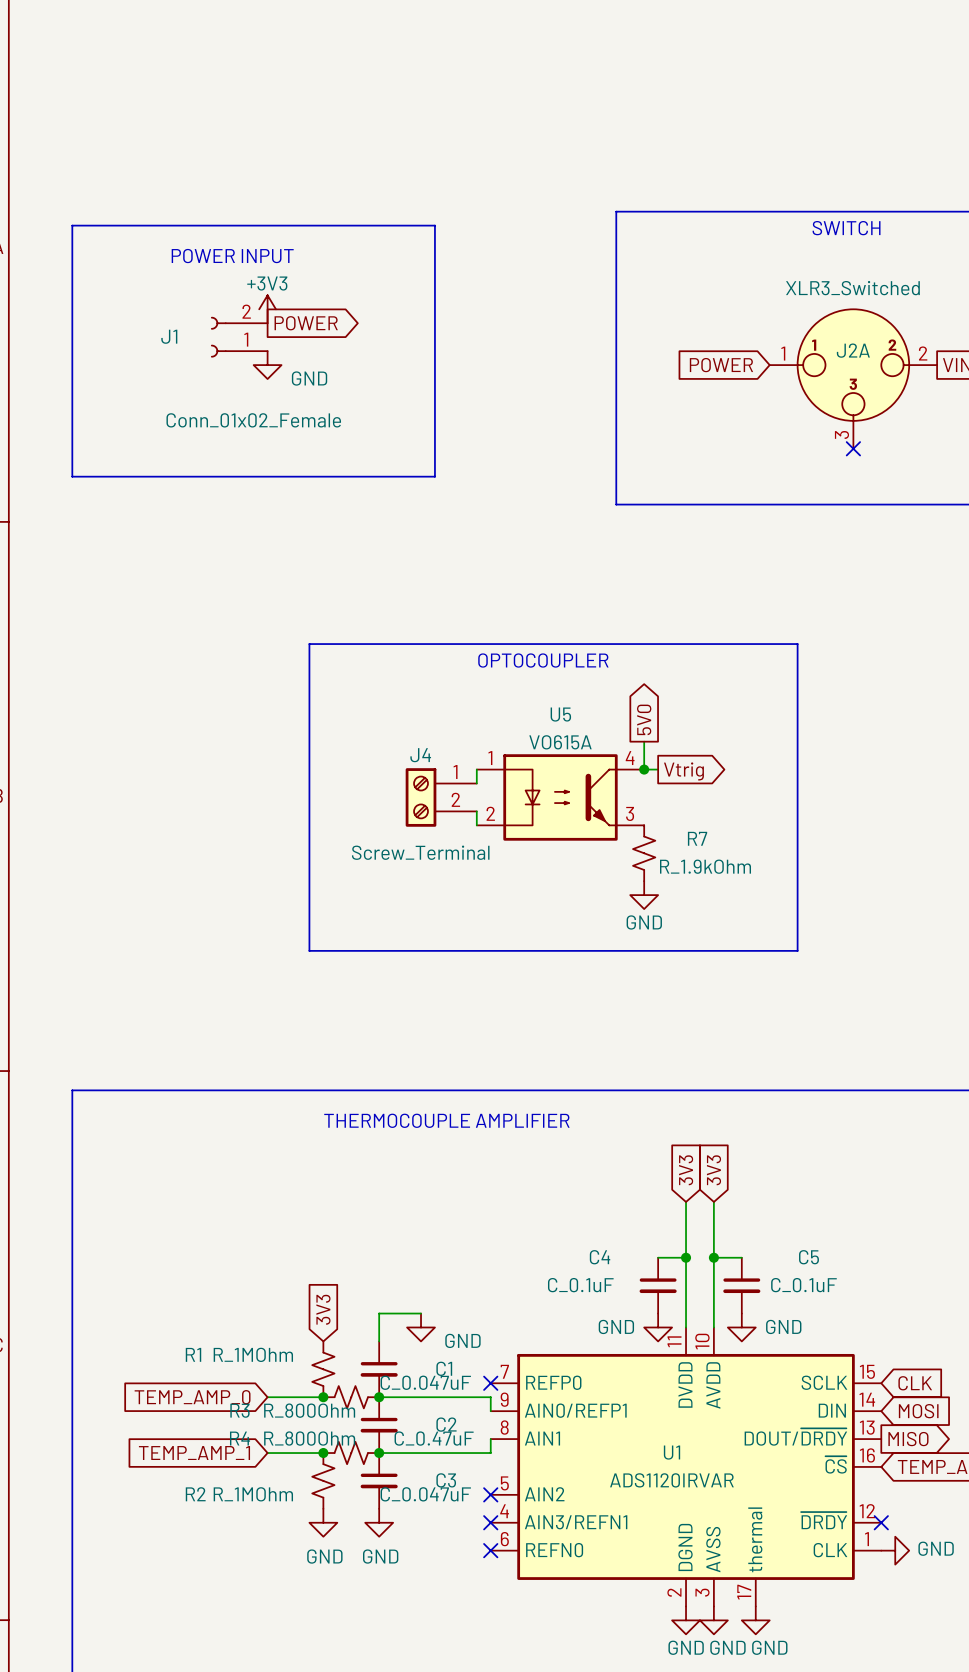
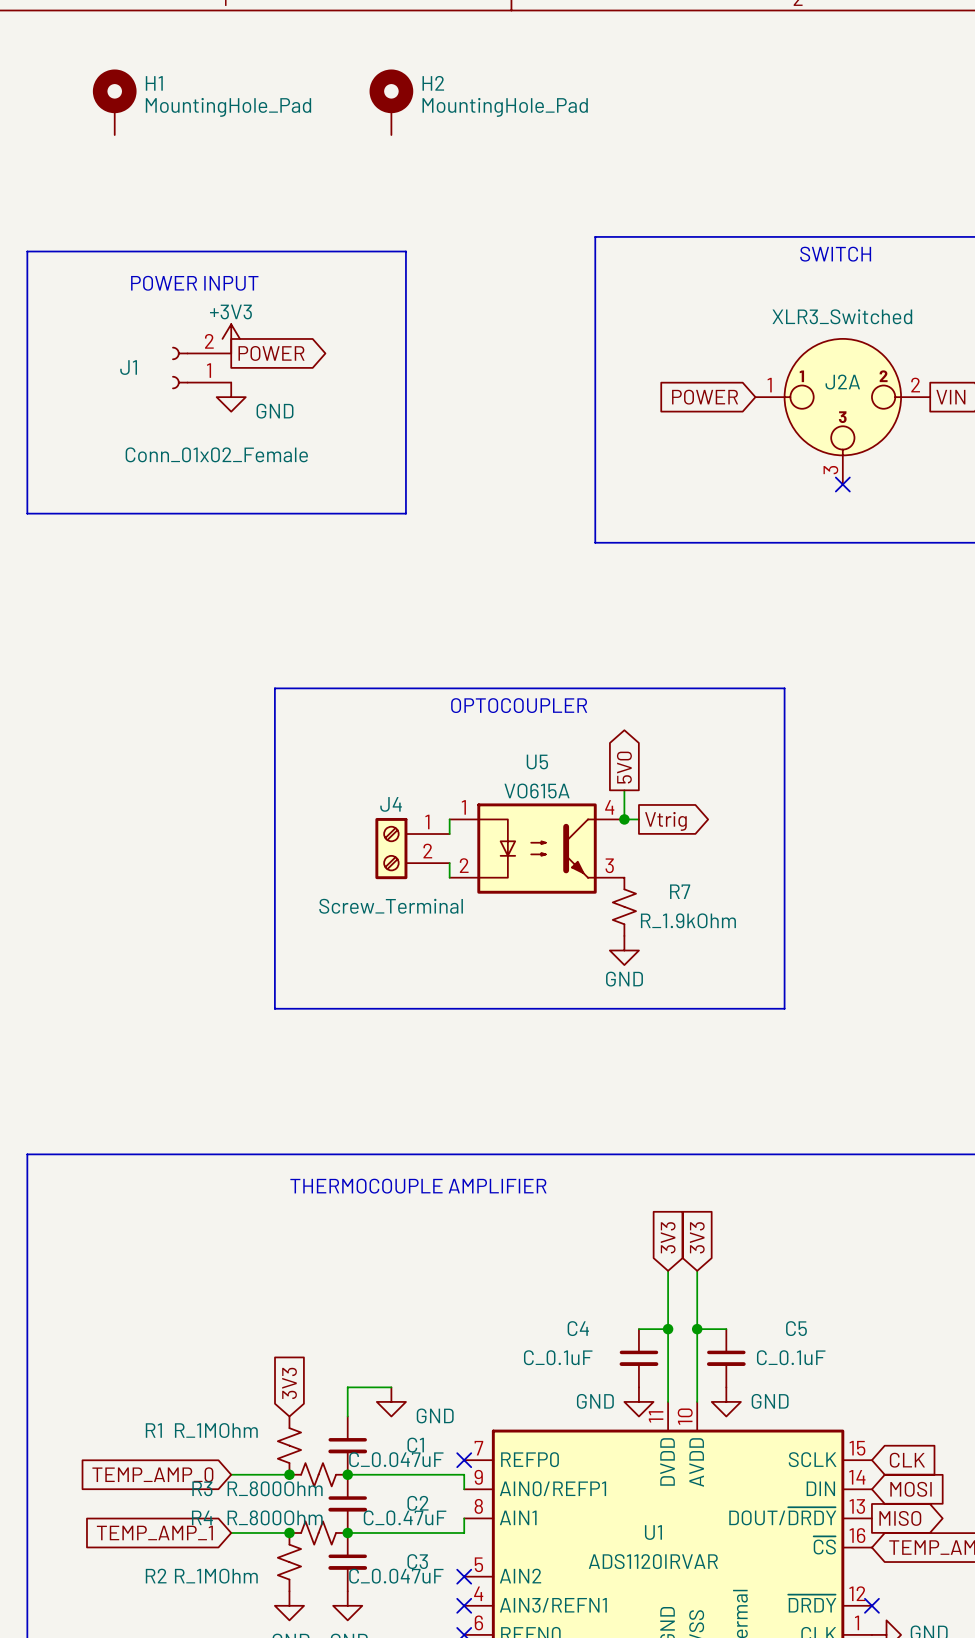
H1: none -> MountingHole_Pad (114, 102)
H2: none -> MountingHole_Pad (391, 102)

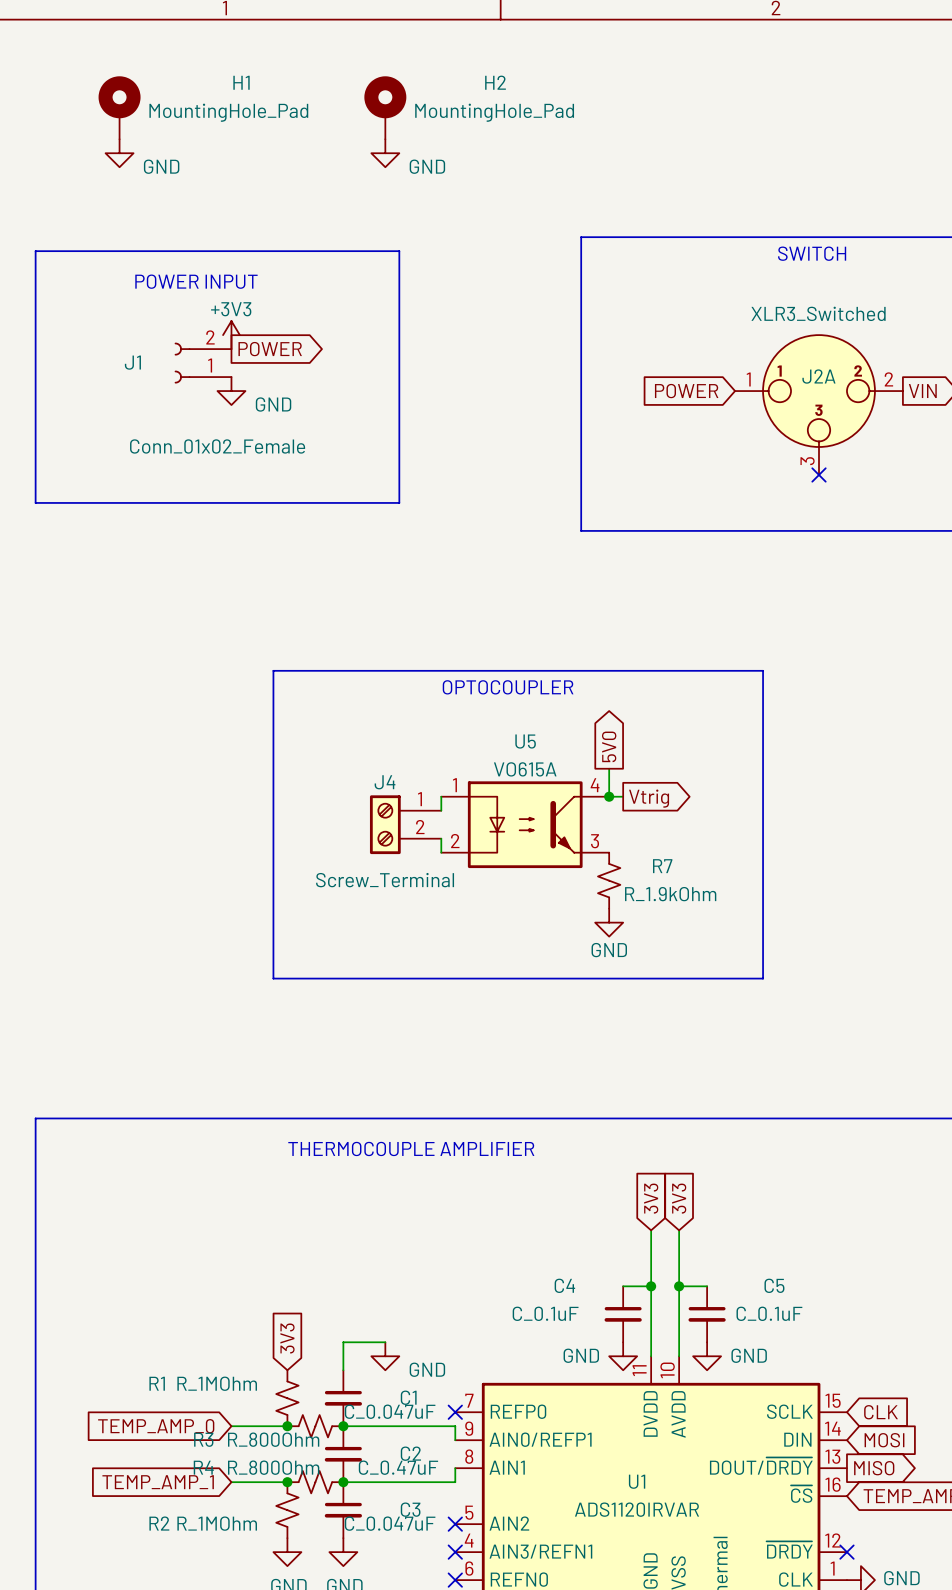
H1 name position: H1 (154, 83) -> H1 (241, 82)
H2 name position: H2 (433, 83) -> H2 (495, 82)
power symbol: none -> GND (119, 153)
power symbol: none -> GND (385, 153)

